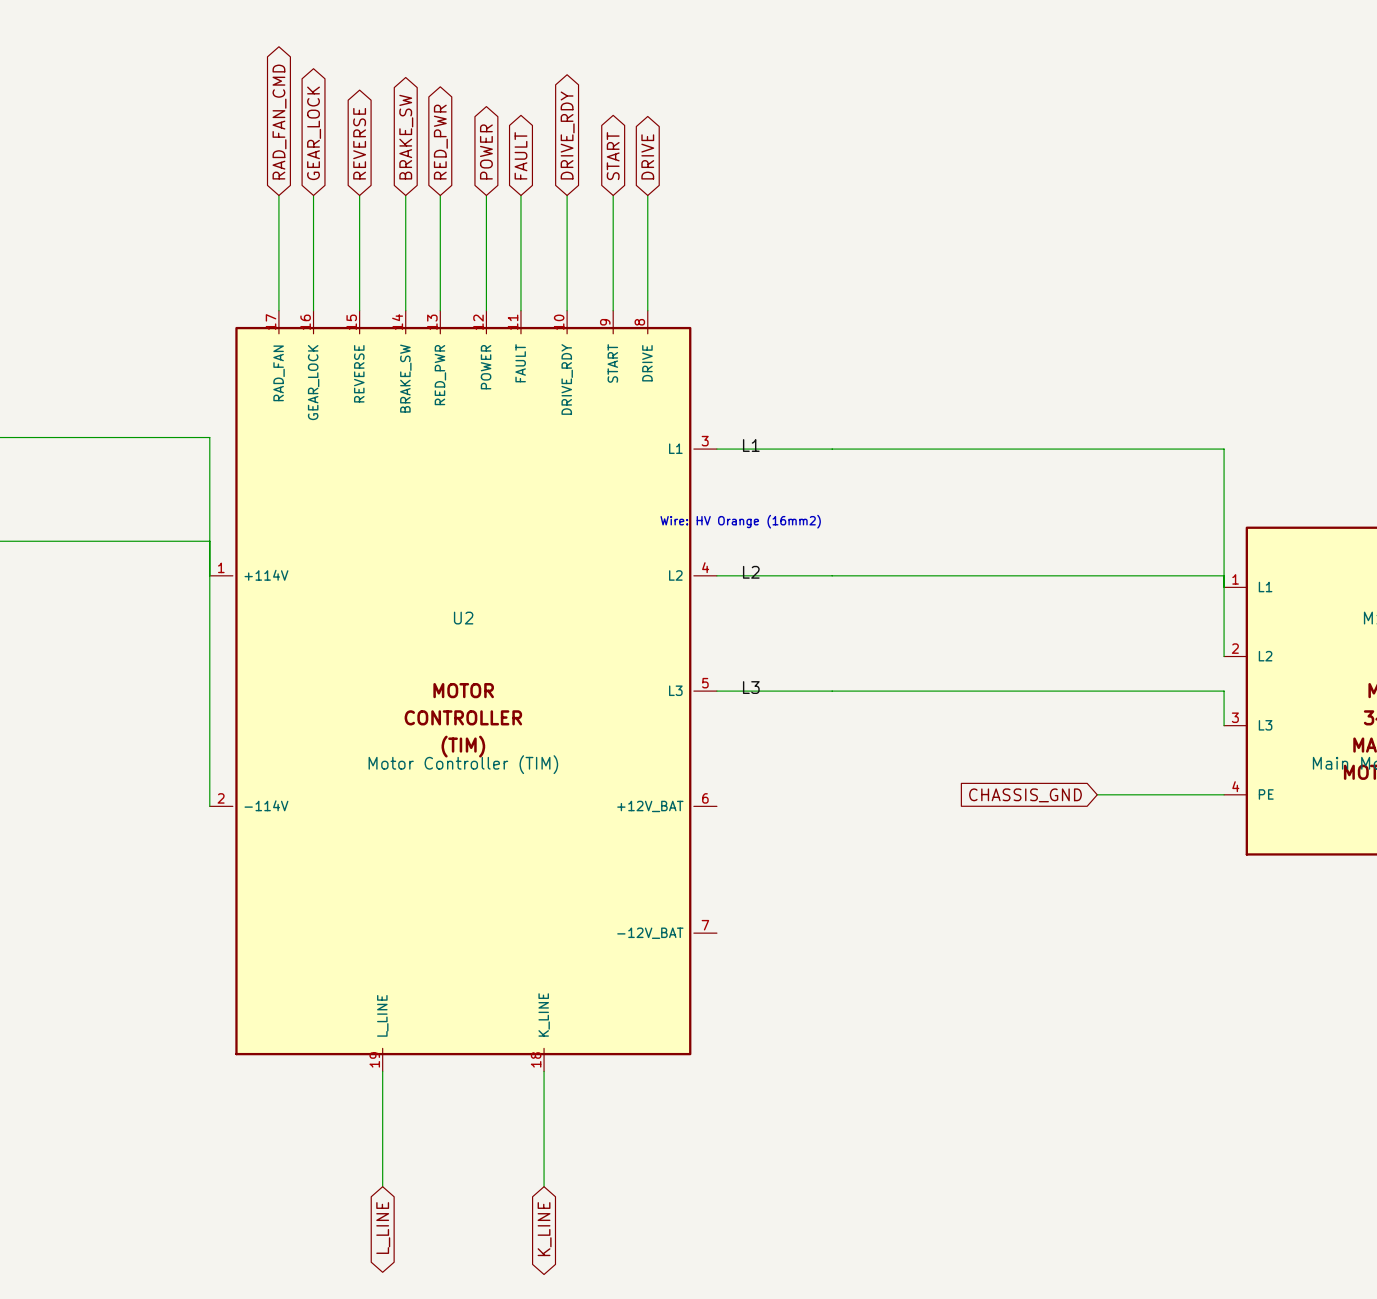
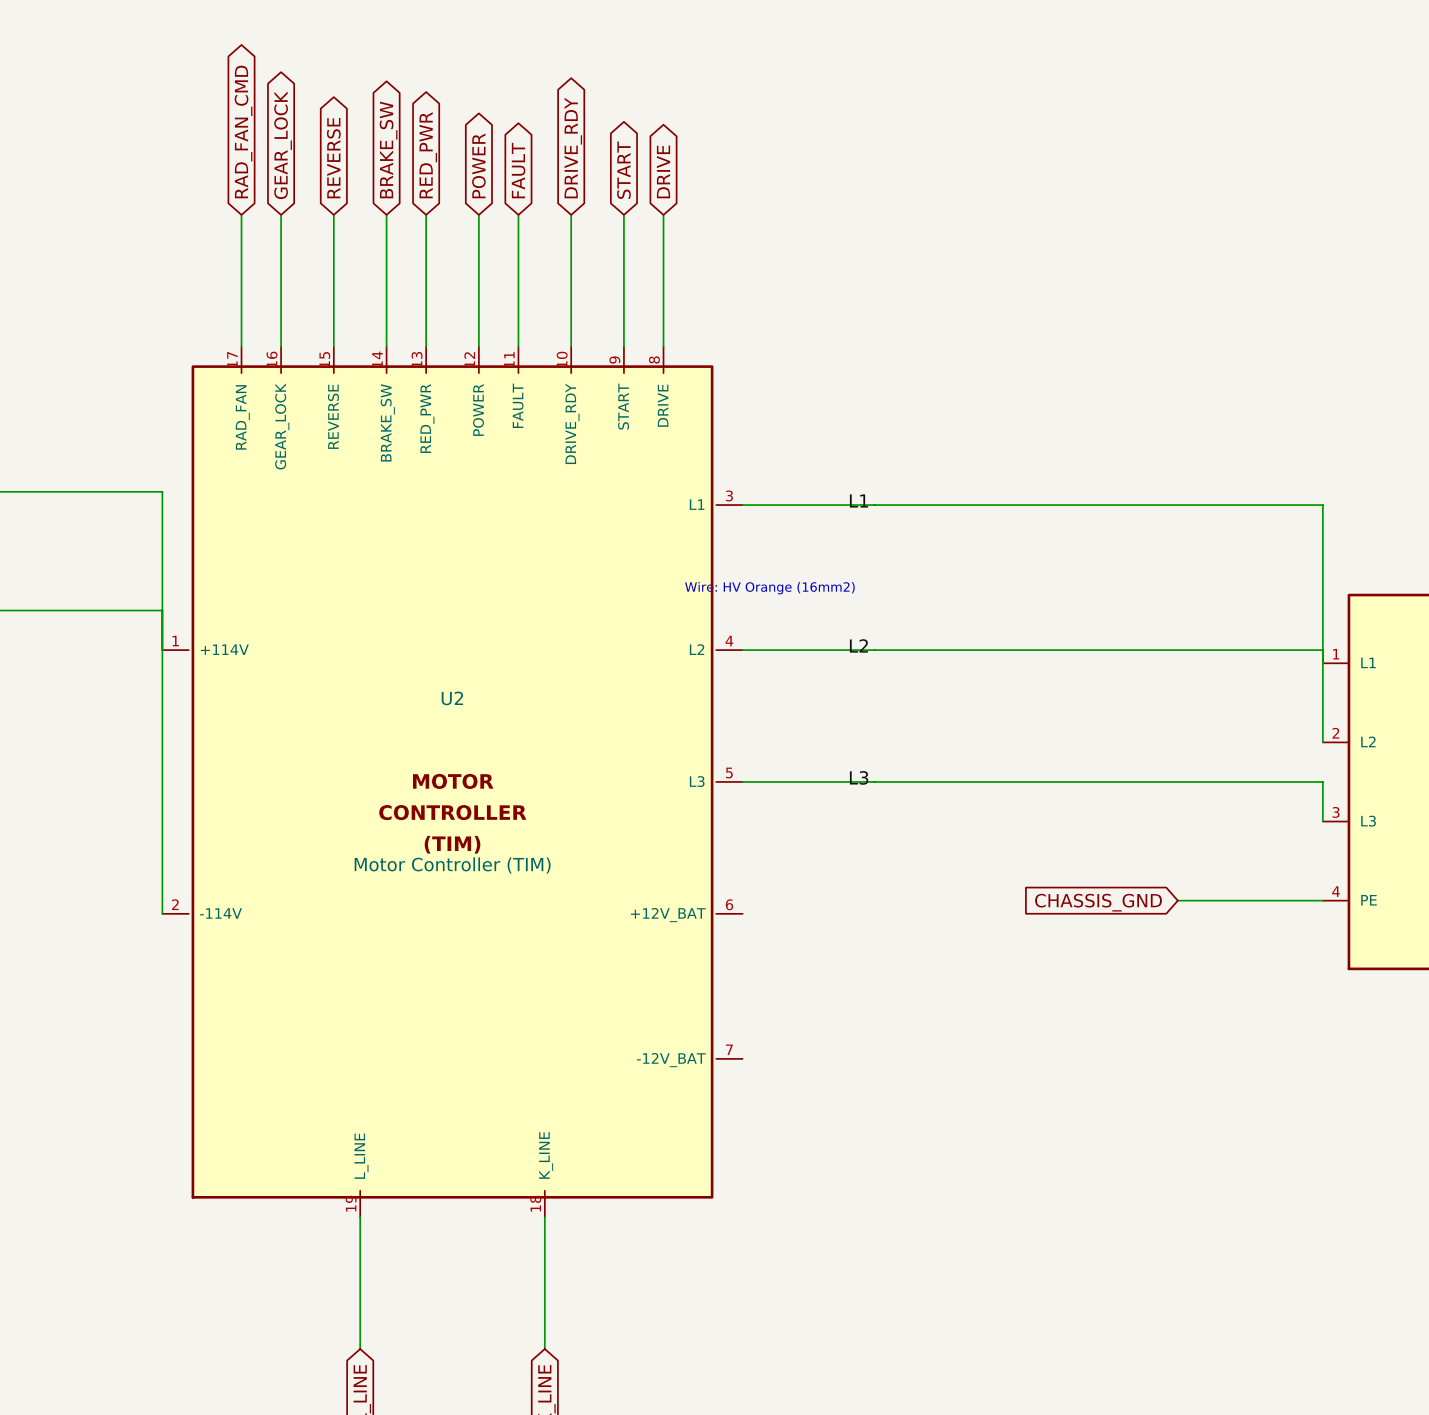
label position: L1 (751, 445) -> L1 (858, 500)
label position: L2 (751, 572) -> L2 (858, 645)
label position: L3 (751, 687) -> L3 (859, 777)

